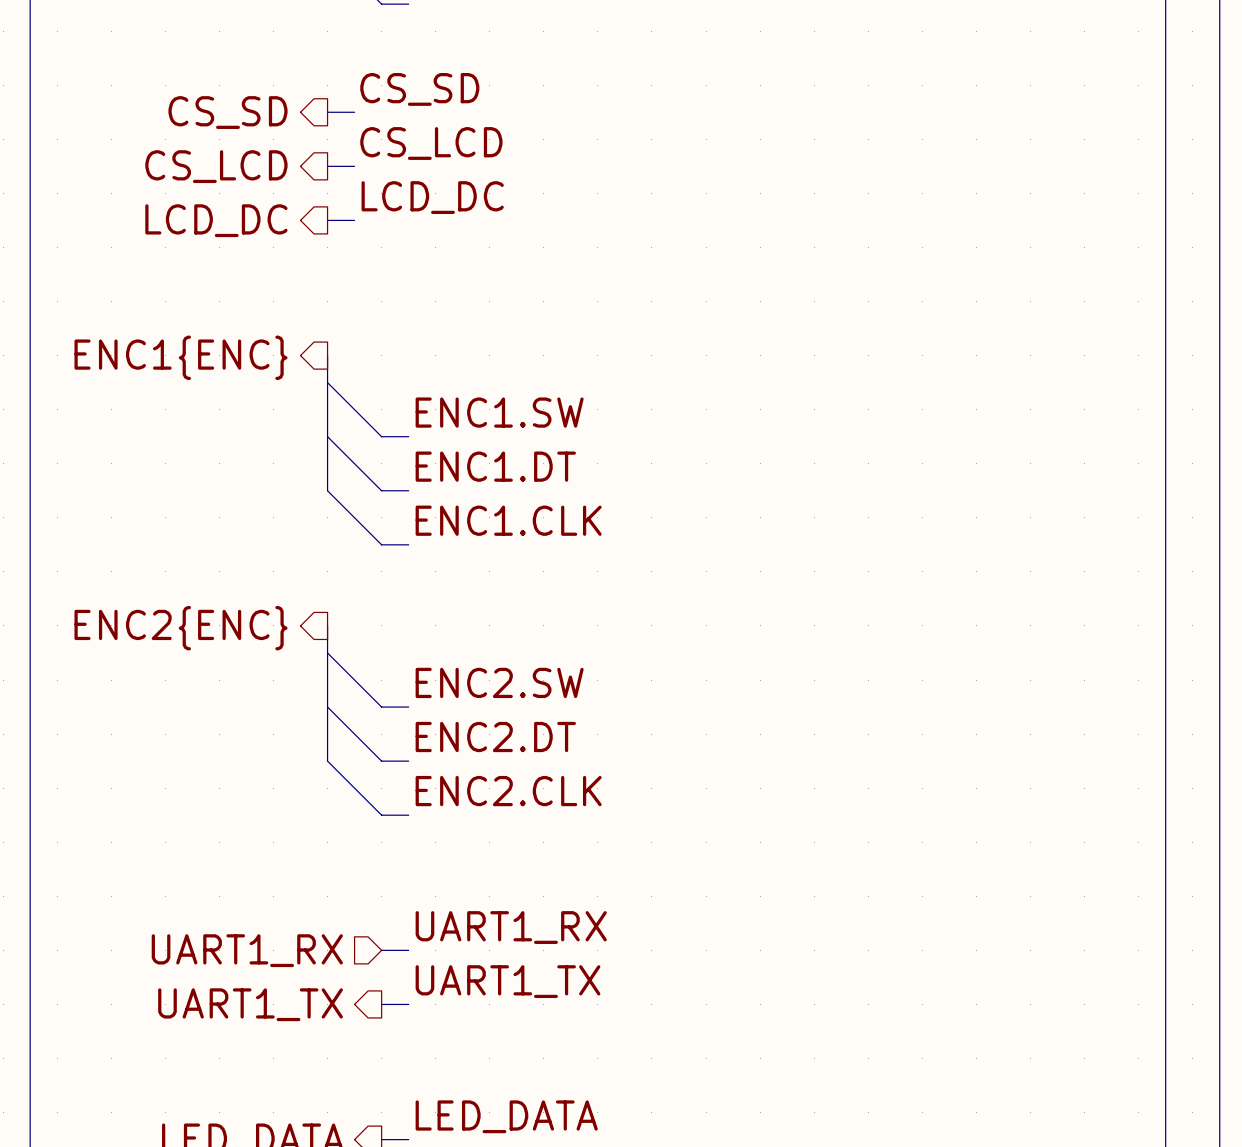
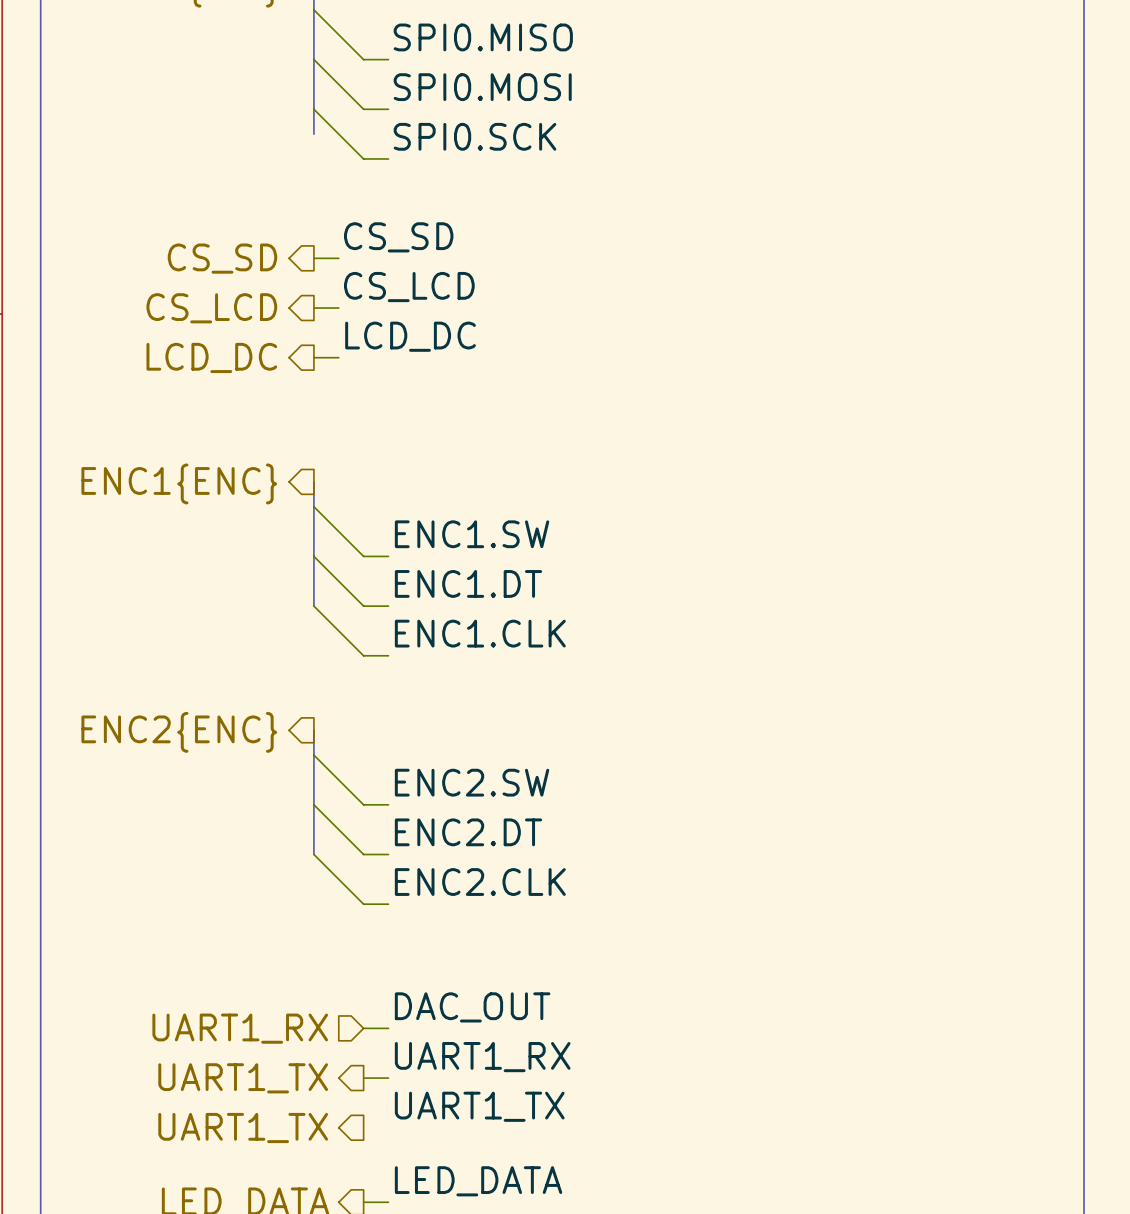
label: UART1_RX (511, 927) -> DAC_OUT (472, 1007)
label: UART1_TX (507, 981) -> UART1_RX (482, 1057)
label: none -> UART1_TX (479, 1106)
hierarchical label: none -> UART1_TX (243, 1128)

